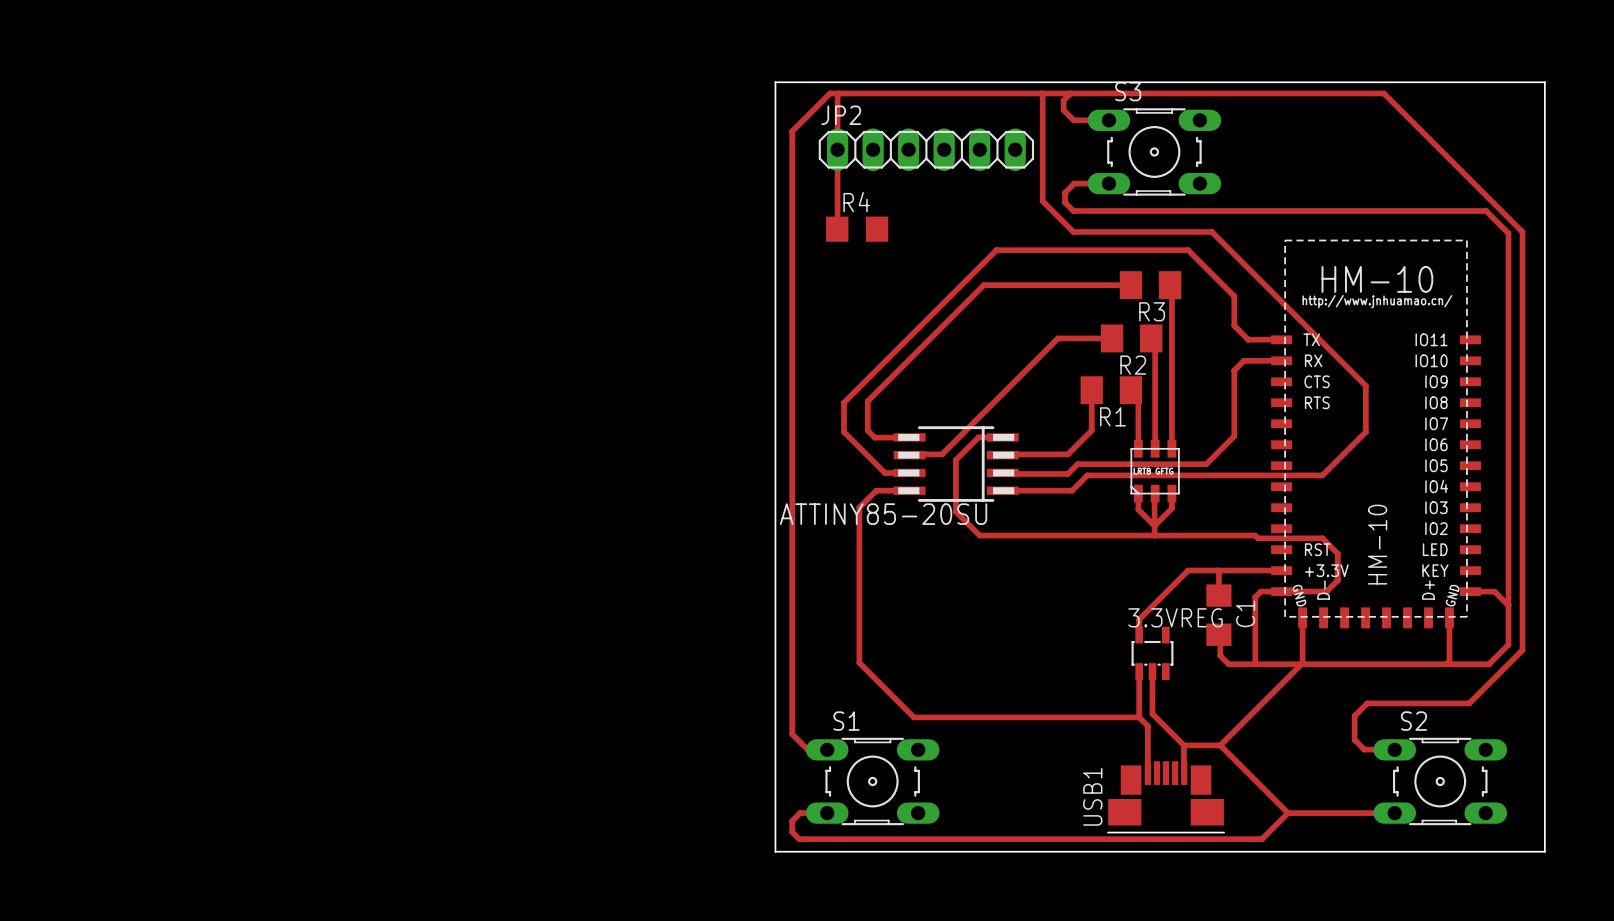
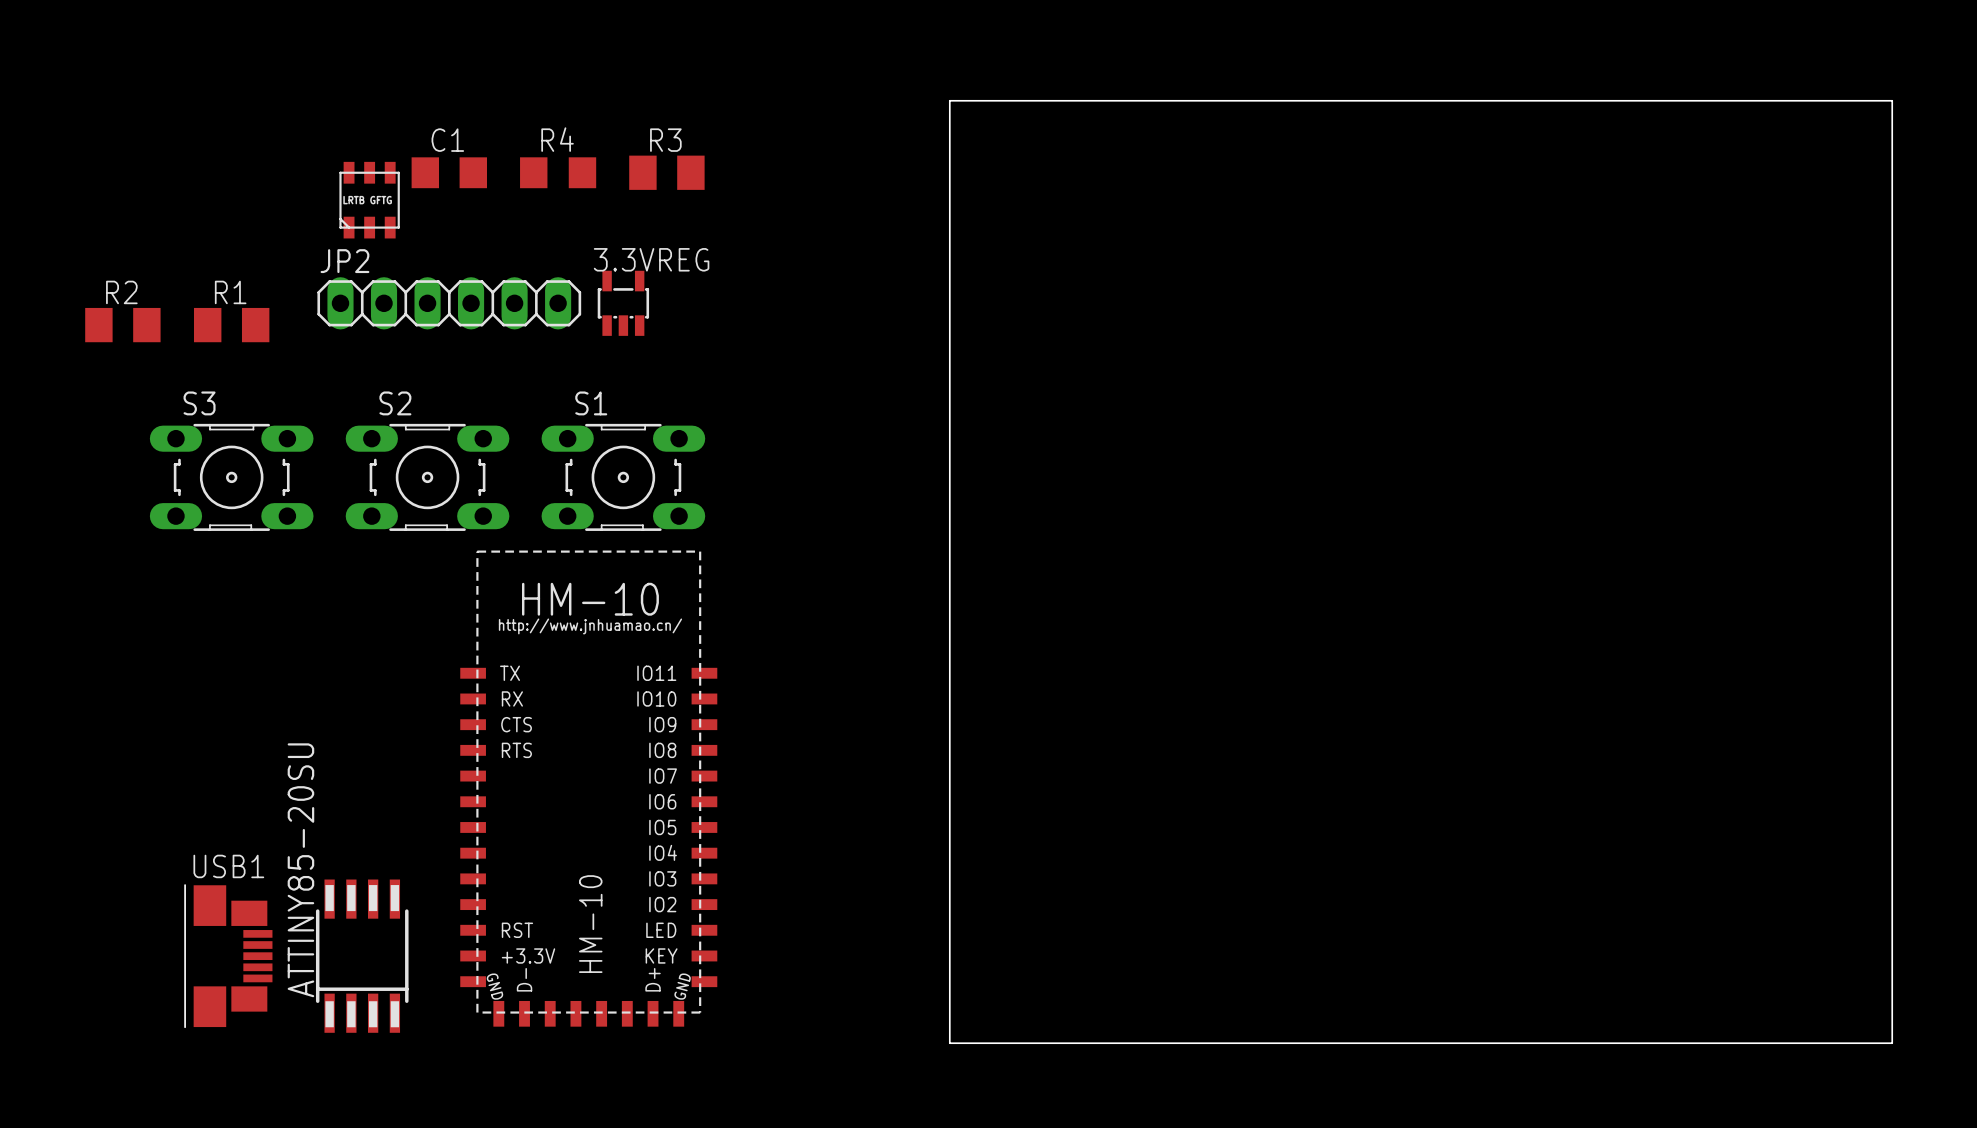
top track: (839, 93) (837, 95) (837, 229) -> none
top track: (1041, 93) (1042, 201) (1073, 231) (1211, 231) (1365, 385) (1365, 432) (1322, 475) (1087, 475) (1072, 490) (1002, 490) -> none
top track: (1070, 93) (1063, 100) (1063, 110) (1073, 120) (1108, 120) -> none
JP2 position: (926, 149) -> (449, 303)
S3 position: (1154, 151) -> (231, 477)
part: none -> (369, 200)
top track: (1108, 183) (1074, 183) (1065, 192) (1065, 202) (1073, 210) (1486, 210) (1508, 233) (1508, 644) (1488, 664) (1228, 664) (1220, 655) (1218, 634) -> none
R4 position: (857, 229) -> (558, 172)
top track: (1130, 285) (983, 285) (867, 401) (867, 430) (874, 437) (909, 437) -> none
R3 position: (1150, 285) -> (666, 172)
top track: (1170, 285) (1171, 286) (1171, 448) -> none
R3 name position: R3 (1152, 311) -> R3 (665, 140)
top track: (1155, 329) (1151, 338) (1155, 342) (1155, 448) -> none
top track: (1112, 338) (1057, 338) (941, 454) (909, 455) -> none
R2 position: (1131, 338) -> (122, 325)
top track: (1281, 339) (1248, 339) (1234, 325) (1234, 296) (1188, 250) (996, 250) (844, 402) (844, 432) (884, 472) (909, 472) -> none
top track: (1281, 360) (1243, 360) (1234, 370) (1234, 436) (1206, 464) (1077, 464) (1067, 473) (1002, 472) -> none
R2 name position: R2 (1133, 365) -> R2 (121, 292)
top track: (1091, 390) (1091, 430) (1067, 454) (1002, 455) -> none
R1 position: (1111, 390) -> (231, 325)
top track: (1130, 390) (1138, 397) (1138, 448) -> none
R1 name position: R1 (1112, 416) -> R1 (230, 292)
HM-10 position: (1376, 433) -> (588, 788)
top track: (1002, 437) (978, 437) (955, 460) (955, 511) (979, 535) (1255, 535) (1258, 538) (1322, 538) (1337, 553) (1337, 580) (1326, 591) (1281, 591) -> none
ATTINY85-20SU rotation: 0° (956, 464) -> 90° clockwise (362, 956)
ATTINY85-20SU position: (956, 464) -> (362, 956)
part: (1155, 471) -> none
top track: (909, 490) (876, 490) (859, 507) (859, 662) (913, 717) (1139, 717) -> none
top track: (1138, 493) (1138, 509) (1154, 525) (1171, 508) (1171, 493) -> none
top track: (1155, 493) (1154, 535) -> none
top track: (1217, 570) (1218, 595) -> none
top track: (1281, 570) (1188, 570) (1139, 619) (1139, 635) -> none
top track: (1281, 591) (1260, 591) (1255, 597) (1255, 664) -> none
top track: (1470, 591) (1494, 591) (1508, 605) -> none
C1 name position: C1 (1245, 613) -> C1 (447, 140)
C1 rotation: 0° (1218, 615) -> 90° clockwise (449, 172)
C1 position: (1218, 615) -> (449, 172)
top track: (1302, 617) (1302, 663) (1220, 745) -> none
top track: (1449, 617) (1449, 661) (1446, 664) -> none
3.3VREG position: (1152, 653) -> (623, 303)
top track: (1139, 671) (1139, 717) -> none
top track: (1152, 671) (1152, 713) (1183, 745) -> none
top track: (1139, 717) (1147, 726) (1147, 773) -> none
top track: (1183, 745) (1184, 773) -> none
top track: (1183, 745) (1220, 745) -> none
top track: (1220, 745) (1288, 813) -> none
top track: (827, 749) (807, 749) (792, 734) (792, 131) (830, 93) (1384, 93) (1522, 231) (1522, 650) (1469, 703) (1367, 703) (1354, 716) (1354, 739) (1364, 749) (1394, 749) -> none
S1 position: (872, 781) -> (623, 477)
S2 position: (1440, 781) -> (427, 477)
USB1 rotation: 0° (1166, 796) -> 90° clockwise (228, 956)
USB1 position: (1166, 796) -> (228, 956)
top track: (827, 813) (800, 813) (792, 820) (792, 832) (799, 839) (1262, 839) (1288, 813) -> none
top track: (1288, 813) (1394, 813) -> none

